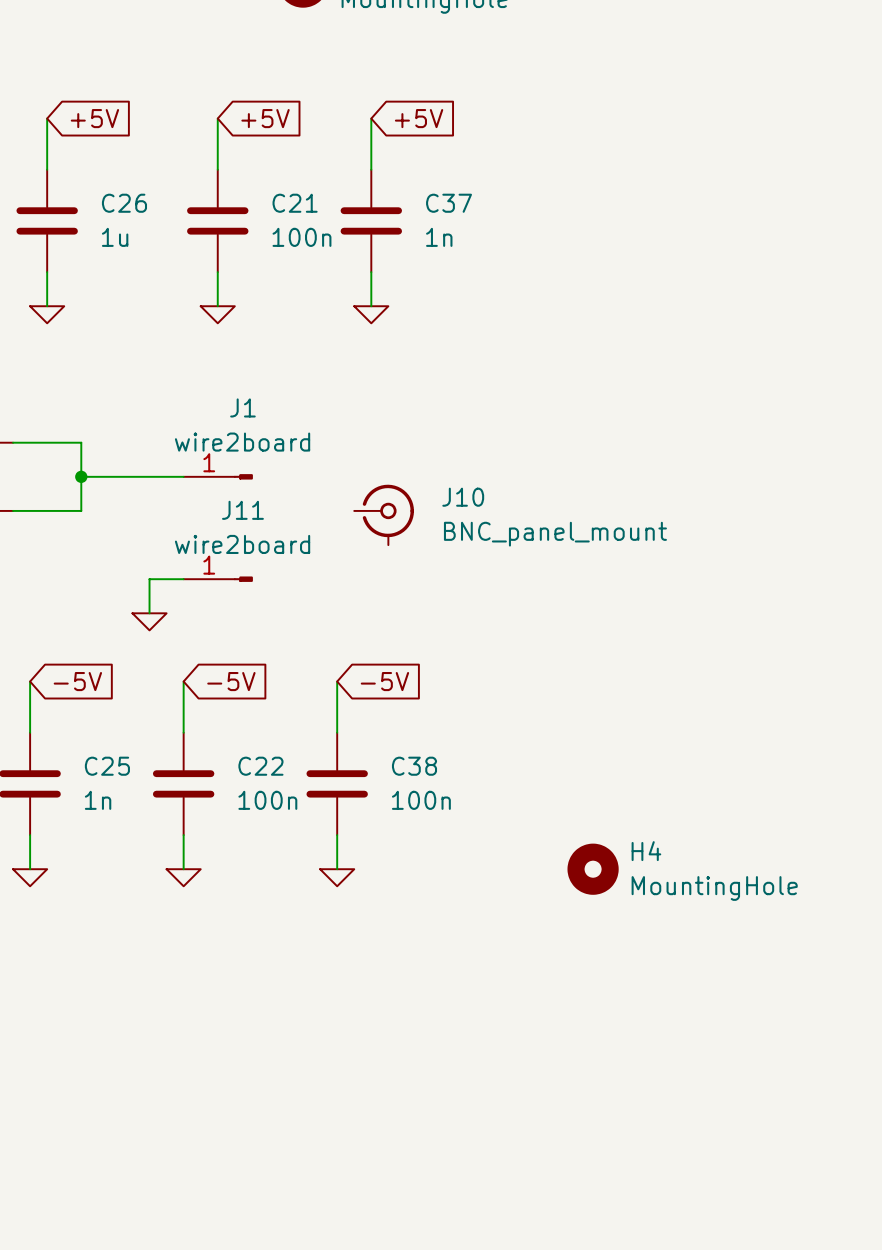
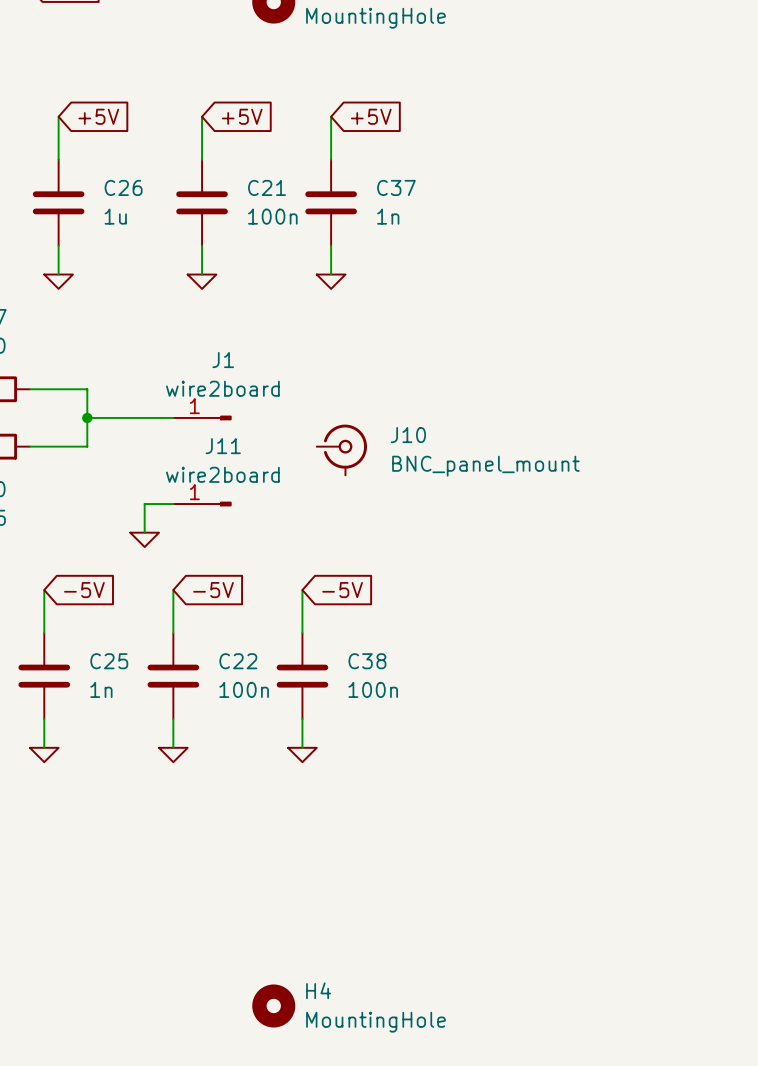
H4 position: (593, 869) -> (273, 1005)

